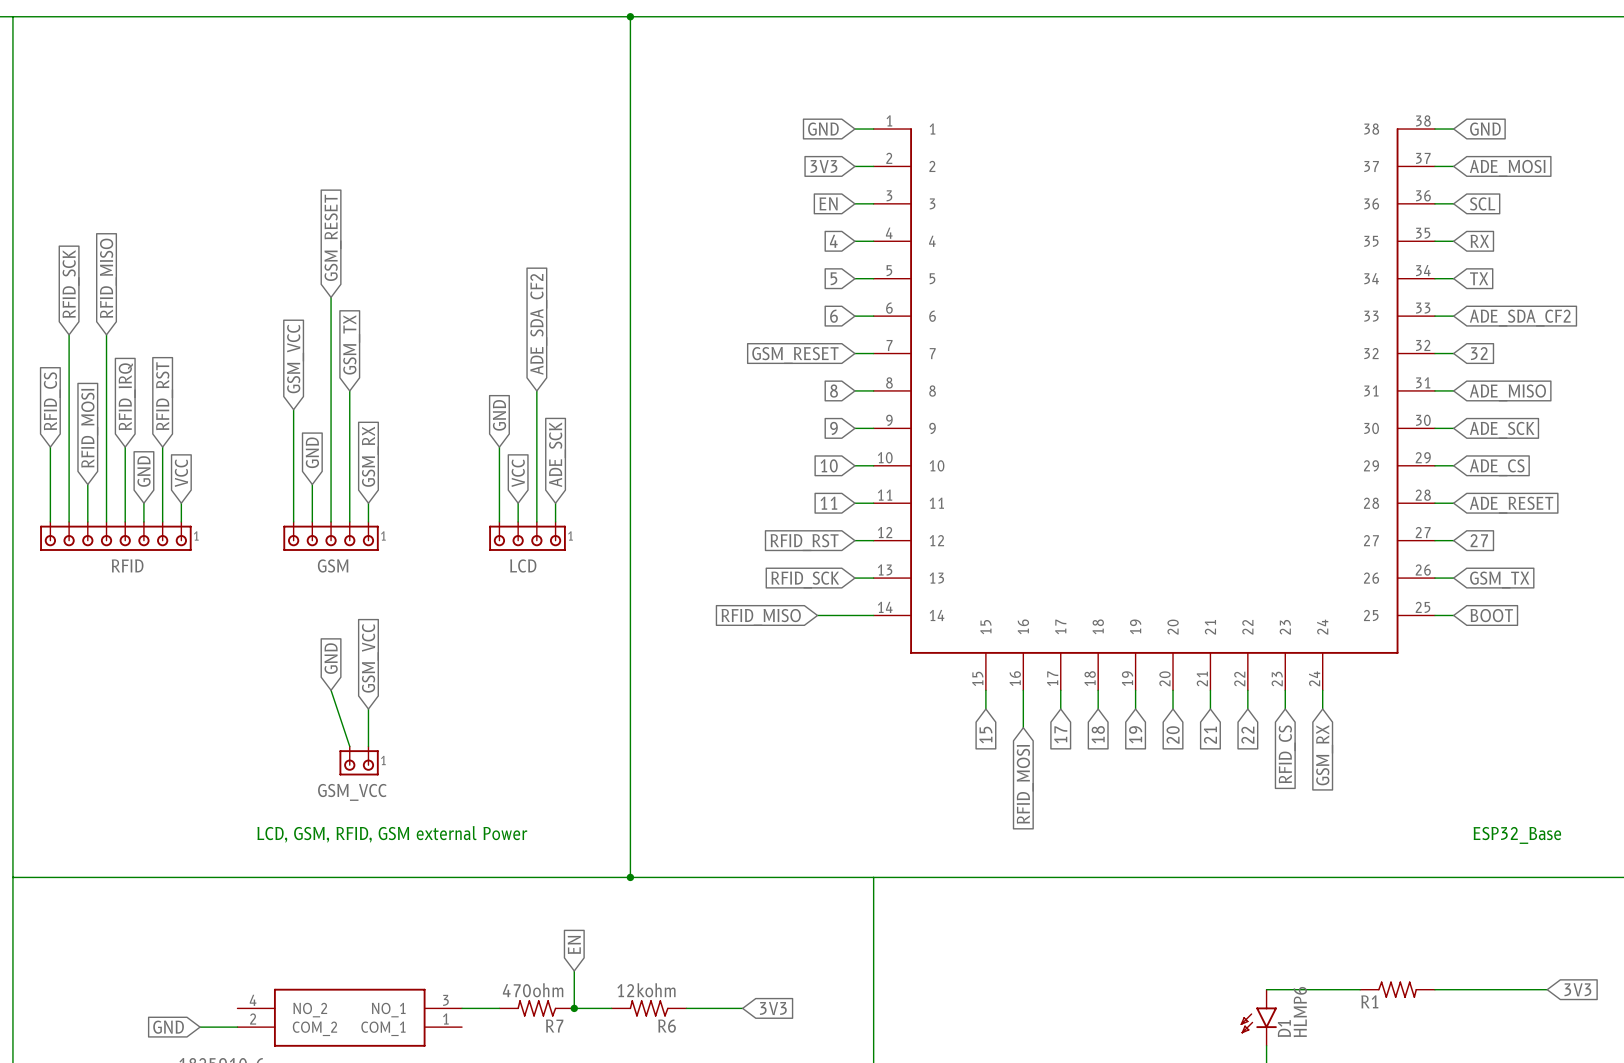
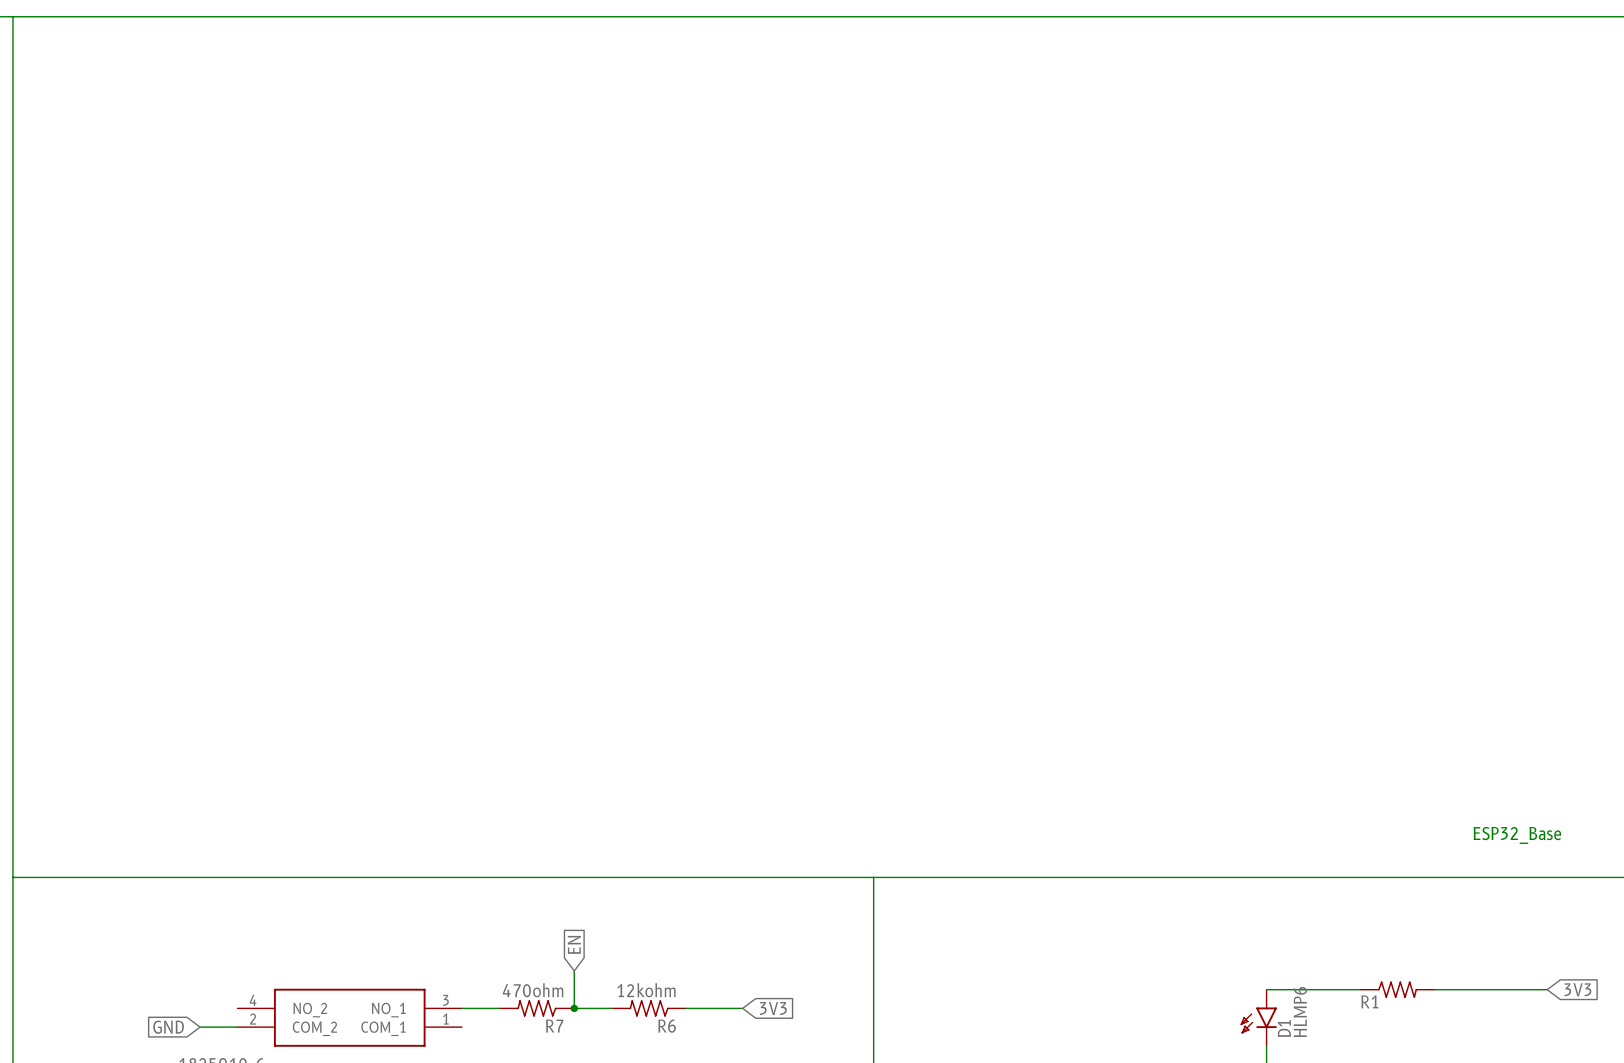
wire: (630, 16) (630, 877) -> none
junction: (630, 16) -> none
global label: GND (823, 129) -> none
wire: (854, 129) (873, 129) -> none
wire: (1434, 129) (1453, 129) -> none
global label: GND (1485, 129) -> none
global label: 3V3 (823, 166) -> none
wire: (854, 166) (873, 166) -> none
wire: (1434, 166) (1453, 166) -> none
global label: ADE_MOSI (1507, 168) -> none
global label: EN (828, 203) -> none
wire: (854, 203) (873, 203) -> none
wire: (1434, 203) (1453, 203) -> none
global label: SCL (1482, 203) -> none
global label: GSM_RESET (333, 237) -> none
global label: 4 (833, 241) -> none
wire: (854, 241) (873, 241) -> none
wire: (1434, 241) (1453, 241) -> none
global label: RX (1479, 241) -> none
global label: RFID_MISO (108, 278) -> none
global label: 5 (833, 278) -> none
wire: (854, 278) (873, 278) -> none
wire: (1434, 278) (1453, 278) -> none
global label: TX (1479, 278) -> none
global label: RFID_SCK (71, 284) -> none
wire: (331, 297) (331, 521) -> none
global label: 6 (833, 316) -> none
wire: (854, 316) (873, 316) -> none
wire: (1434, 316) (1453, 316) -> none
global label: ADE_SDA_CF2 (1520, 318) -> none
global label: ADE_SDA_CF2 (538, 324) -> none
wire: (69, 334) (69, 521) -> none
wire: (106, 334) (106, 521) -> none
global label: GSM_TX (351, 344) -> none
wire: (854, 353) (873, 353) -> none
wire: (1434, 353) (1453, 353) -> none
global label: 32 (1479, 353) -> none
global label: GSM_RESET (795, 355) -> none
global label: GSM_VCC (295, 359) -> none
wire: (349, 390) (349, 521) -> none
wire: (536, 390) (536, 521) -> none
wire: (854, 390) (873, 390) -> none
wire: (1434, 390) (1453, 390) -> none
global label: 8 (834, 391) -> none
global label: ADE_MISO (1507, 392) -> none
global label: RFID_IRQ (127, 396) -> none
global label: RFID_RST (164, 396) -> none
global label: RFID_CS (52, 401) -> none
wire: (293, 409) (293, 521) -> none
part: (1154, 409) -> none
global label: GND (499, 415) -> none
global label: RFID_MOSI (89, 428) -> none
global label: 9 (833, 428) -> none
wire: (854, 428) (873, 428) -> none
wire: (1434, 428) (1453, 428) -> none
global label: ADE_SCK (1502, 430) -> none
wire: (50, 447) (50, 521) -> none
wire: (125, 447) (125, 521) -> none
wire: (162, 447) (162, 521) -> none
wire: (499, 447) (499, 521) -> none
global label: GND (312, 452) -> none
global label: ADE_SCK (557, 454) -> none
global label: GSM_RX (370, 456) -> none
global label: 10 (829, 465) -> none
wire: (854, 465) (873, 465) -> none
wire: (1434, 465) (1453, 465) -> none
global label: ADE_CS (1497, 467) -> none
global label: GND (144, 471) -> none
global label: VCC (181, 473) -> none
global label: VCC (518, 473) -> none
wire: (87, 484) (87, 521) -> none
wire: (312, 484) (312, 521) -> none
wire: (143, 503) (143, 521) -> none
wire: (181, 503) (181, 521) -> none
wire: (368, 503) (368, 521) -> none
wire: (518, 503) (518, 521) -> none
wire: (555, 503) (555, 521) -> none
global label: 11 (828, 503) -> none
wire: (854, 503) (873, 503) -> none
wire: (1434, 503) (1453, 503) -> none
global label: ADE_RESET (1511, 505) -> none
RFID: (115, 536) -> none
GSM: (331, 536) -> none
LCD: (527, 536) -> none
wire: (854, 540) (873, 540) -> none
wire: (1434, 540) (1453, 540) -> none
global label: 27 (1479, 540) -> none
global label: RFID_RST (804, 542) -> none
wire: (854, 578) (873, 578) -> none
wire: (1434, 578) (1453, 578) -> none
global label: RFID_SCK (805, 580) -> none
global label: GSM_TX (1499, 580) -> none
wire: (817, 615) (873, 615) -> none
wire: (1434, 615) (1453, 615) -> none
global label: BOOT (1491, 615) -> none
global label: RFID_MISO (761, 617) -> none
global label: GND (331, 658) -> none
global label: GSM_VCC (370, 658) -> none
wire: (331, 690) (349, 746) -> none
wire: (985, 690) (985, 709) -> none
wire: (1023, 690) (1023, 727) -> none
wire: (1060, 690) (1060, 709) -> none
wire: (1098, 690) (1098, 709) -> none
wire: (1135, 690) (1135, 709) -> none
wire: (1173, 690) (1173, 709) -> none
wire: (1210, 690) (1210, 709) -> none
wire: (1247, 690) (1247, 709) -> none
wire: (1285, 690) (1285, 709) -> none
wire: (1322, 690) (1322, 709) -> none
wire: (368, 709) (368, 746) -> none
global label: 17 (1060, 734) -> none
global label: 18 (1098, 734) -> none
global label: 19 (1135, 734) -> none
global label: 20 (1173, 734) -> none
global label: 15 (985, 735) -> none
global label: 21 (1210, 735) -> none
global label: 22 (1247, 735) -> none
global label: RFID_CS (1287, 754) -> none
global label: GSM_RX (1324, 755) -> none
GSM_VCC: (359, 760) -> none
global label: RFID_MOSI (1025, 784) -> none
text: LCD, GSM, RFID, GSM external Power (392, 834) -> none
junction: (630, 877) -> none

